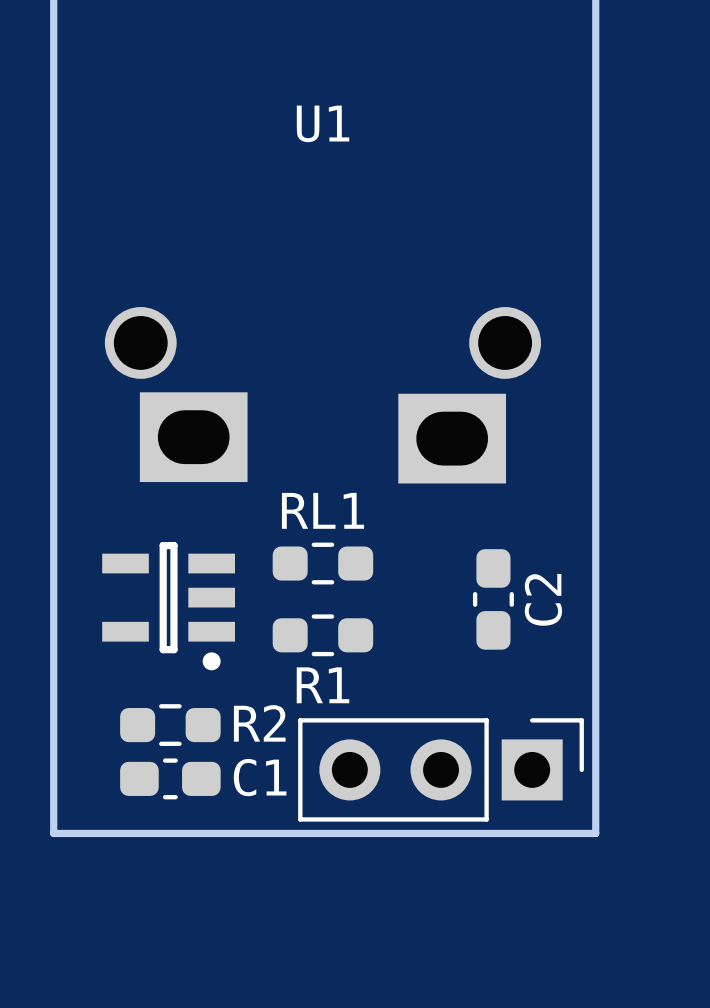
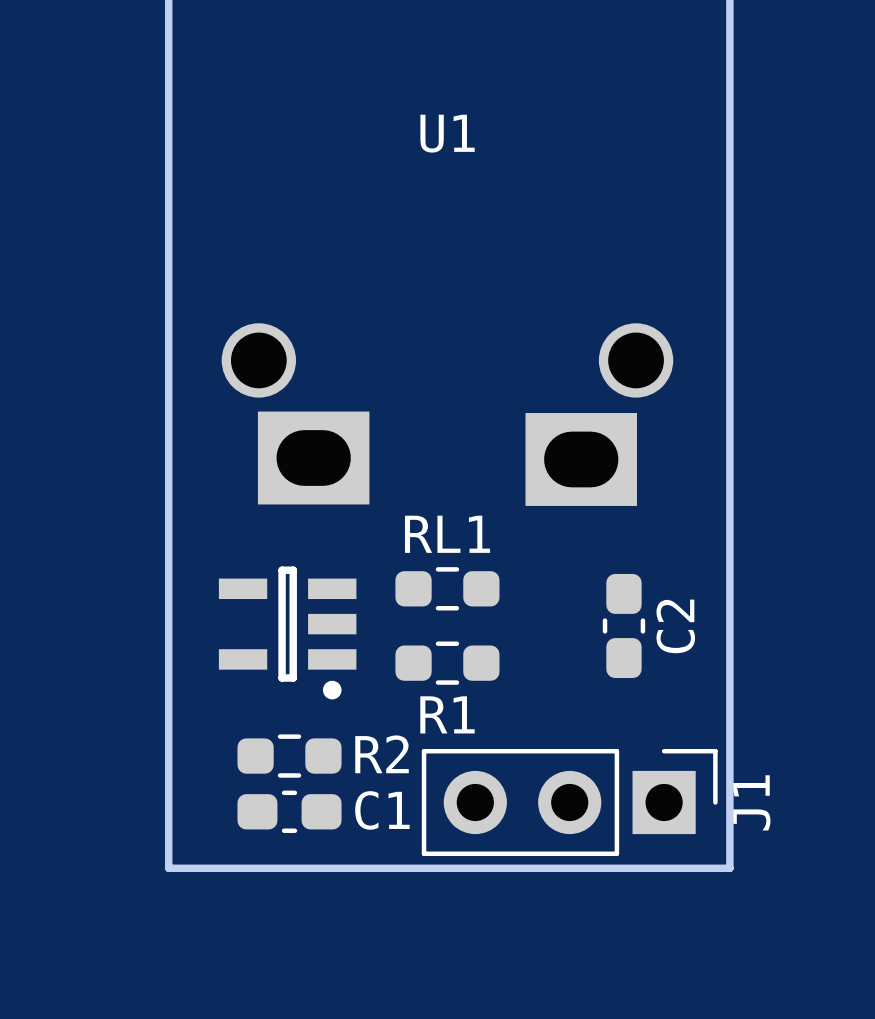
J1 name: none -> J1 (751, 802)

